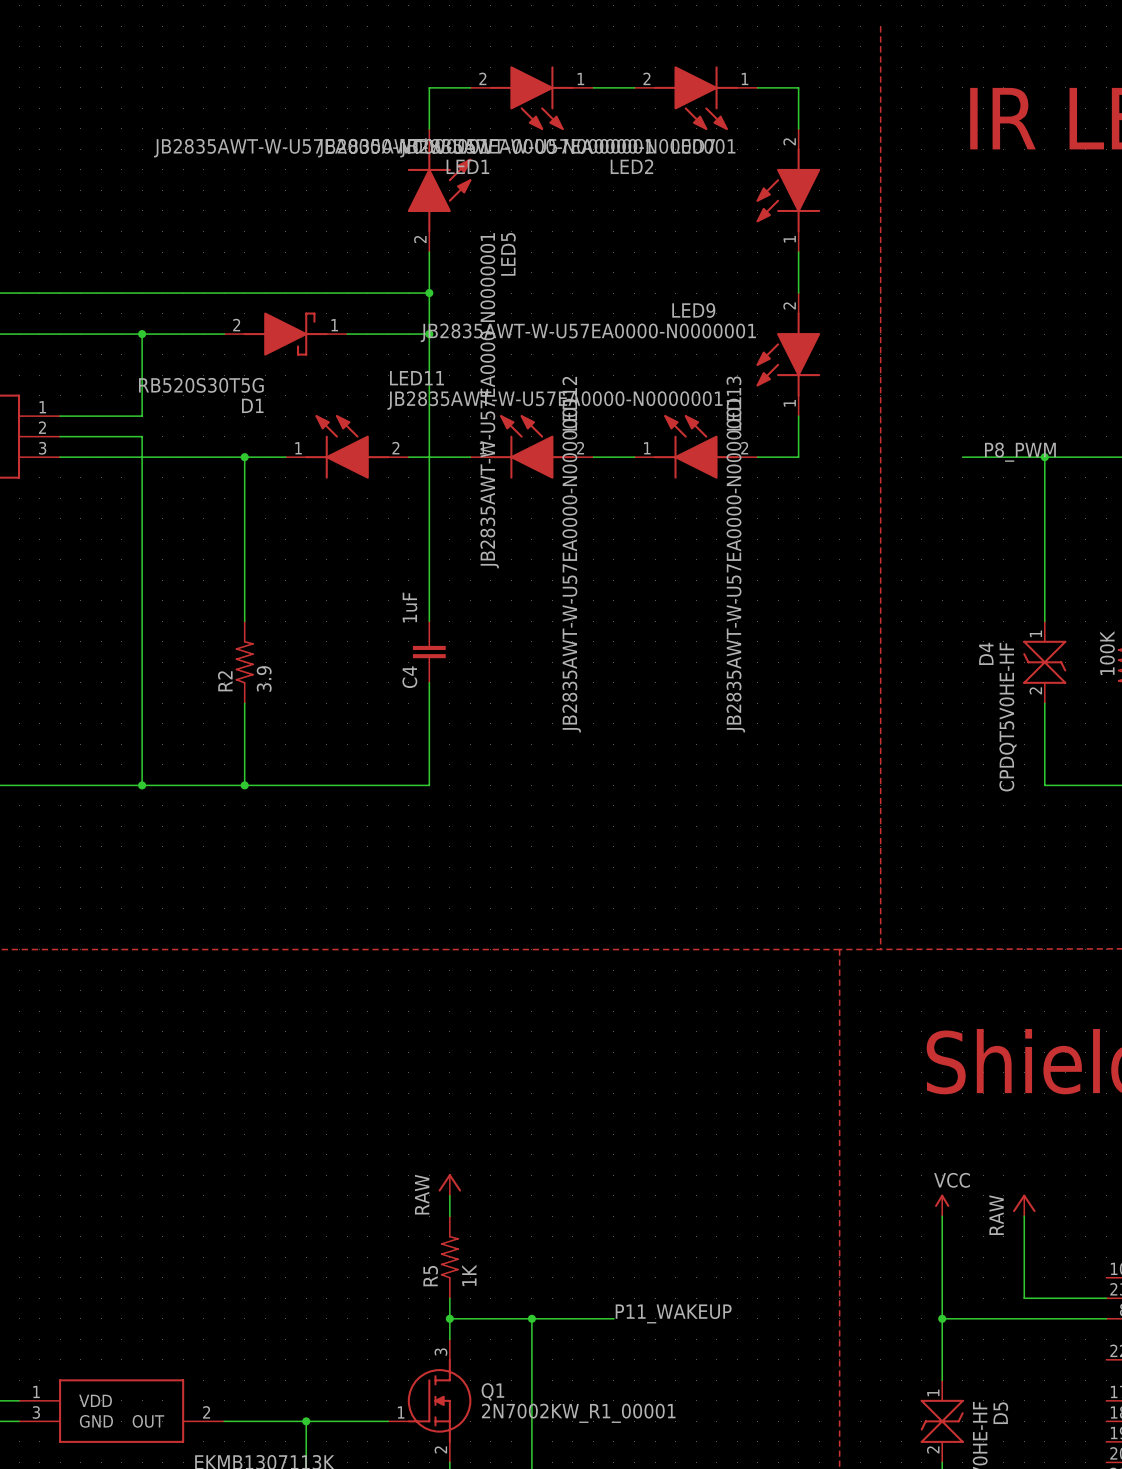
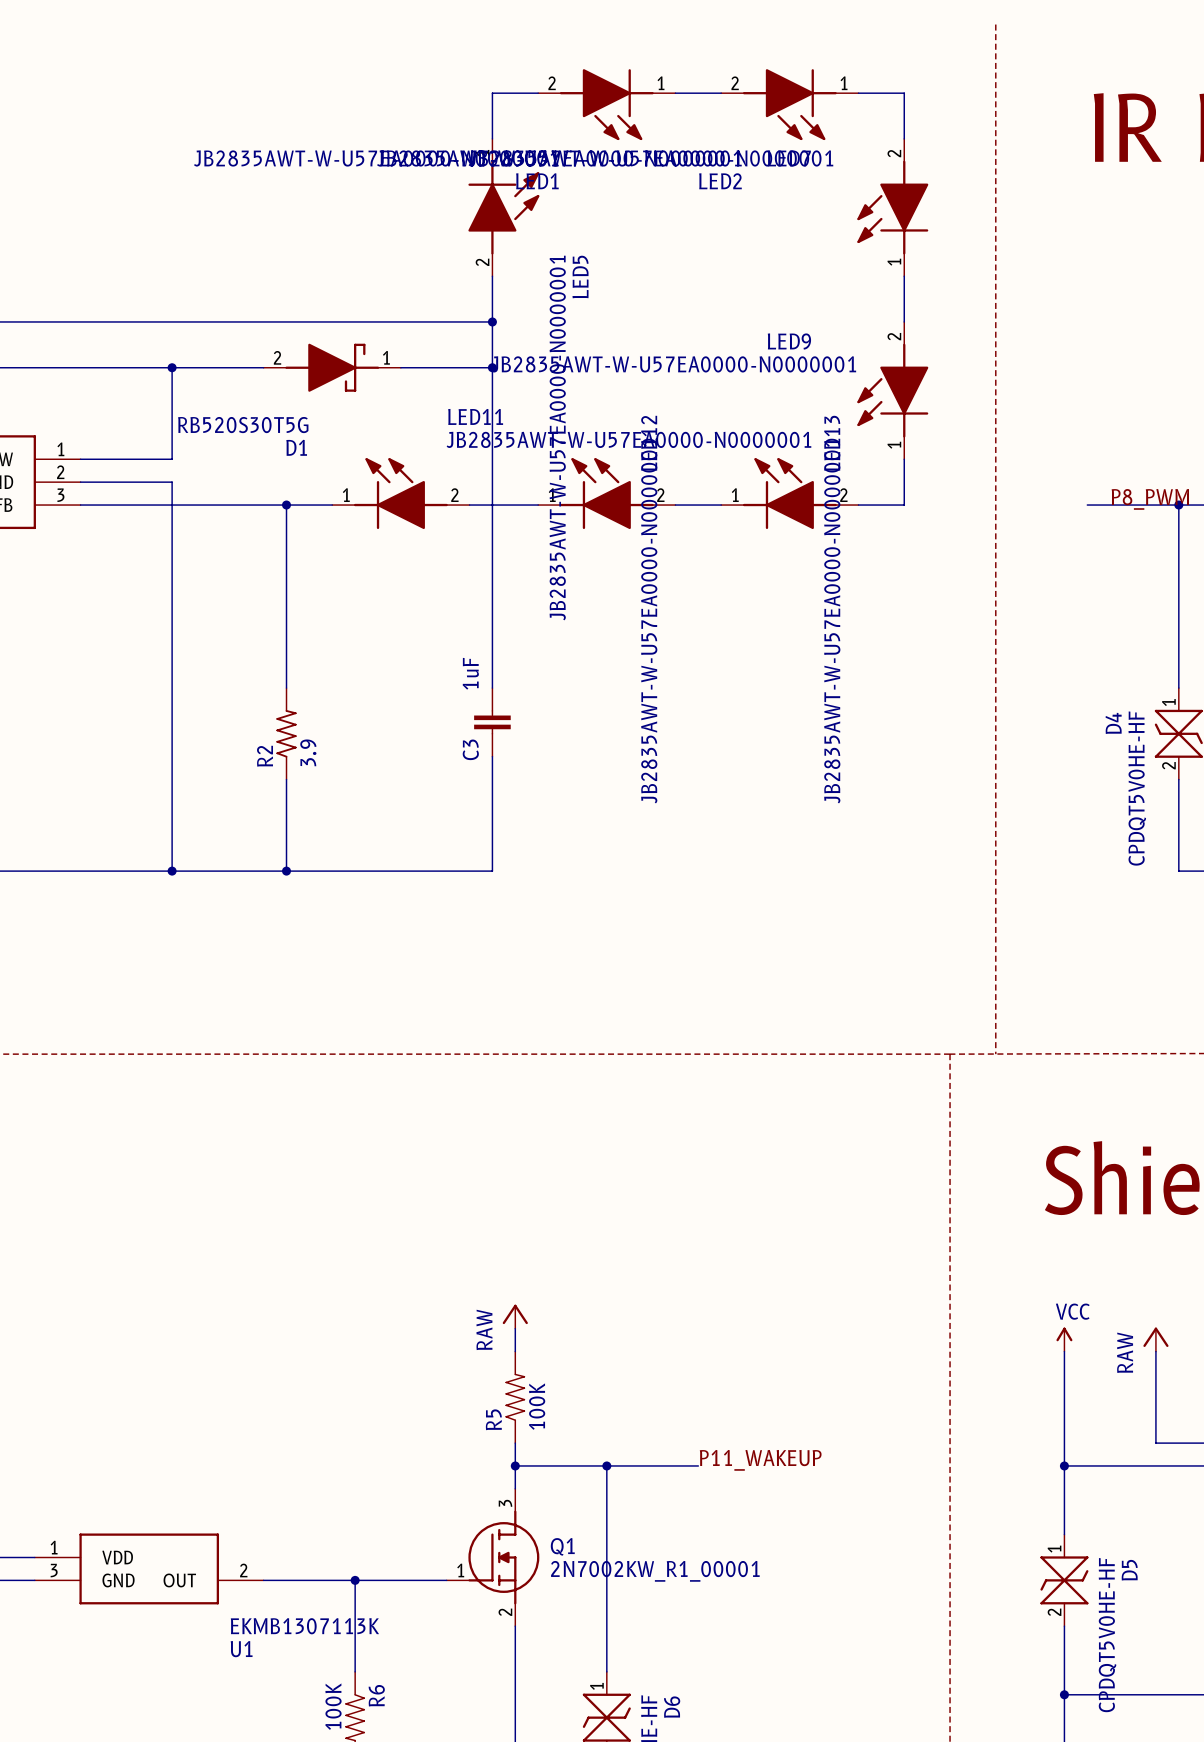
C4 name: C4 (409, 677) -> C3 (470, 749)
R5 value: 1K (469, 1275) -> 100K (537, 1406)

